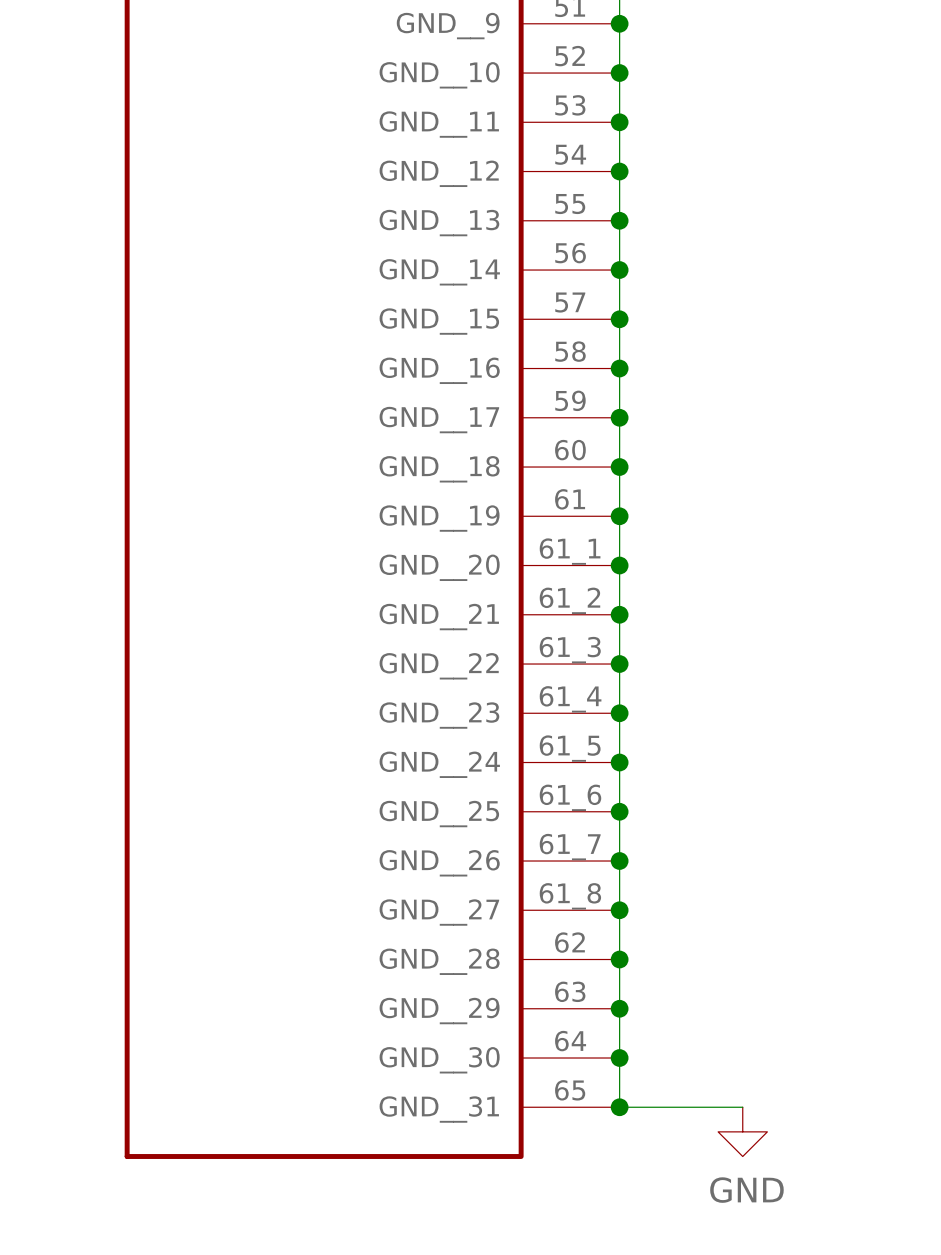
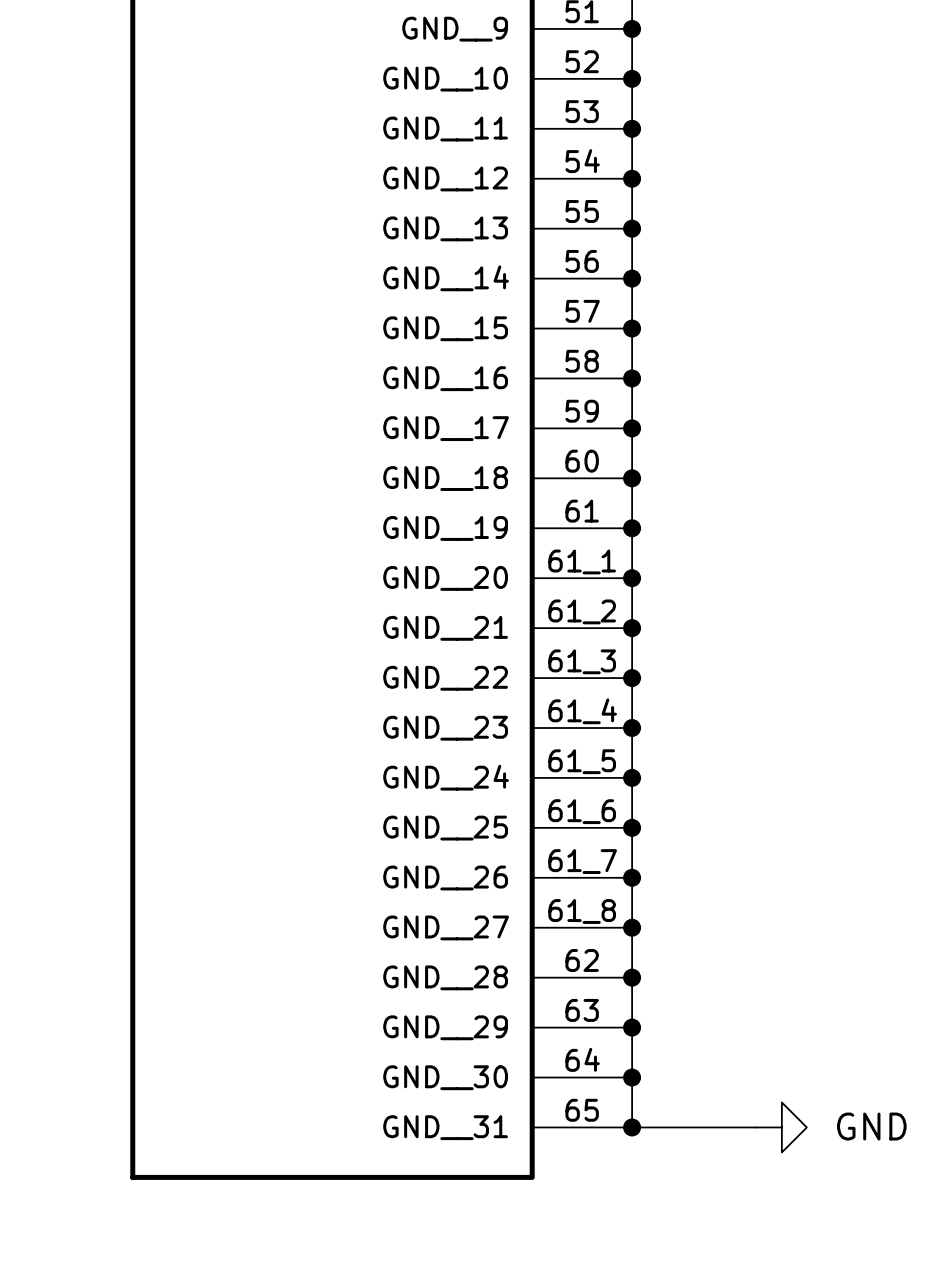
power symbol rotation: 0° (742, 1131) -> 90° counterclockwise (781, 1127)
power symbol position: GND (742, 1131) -> GND (781, 1127)

